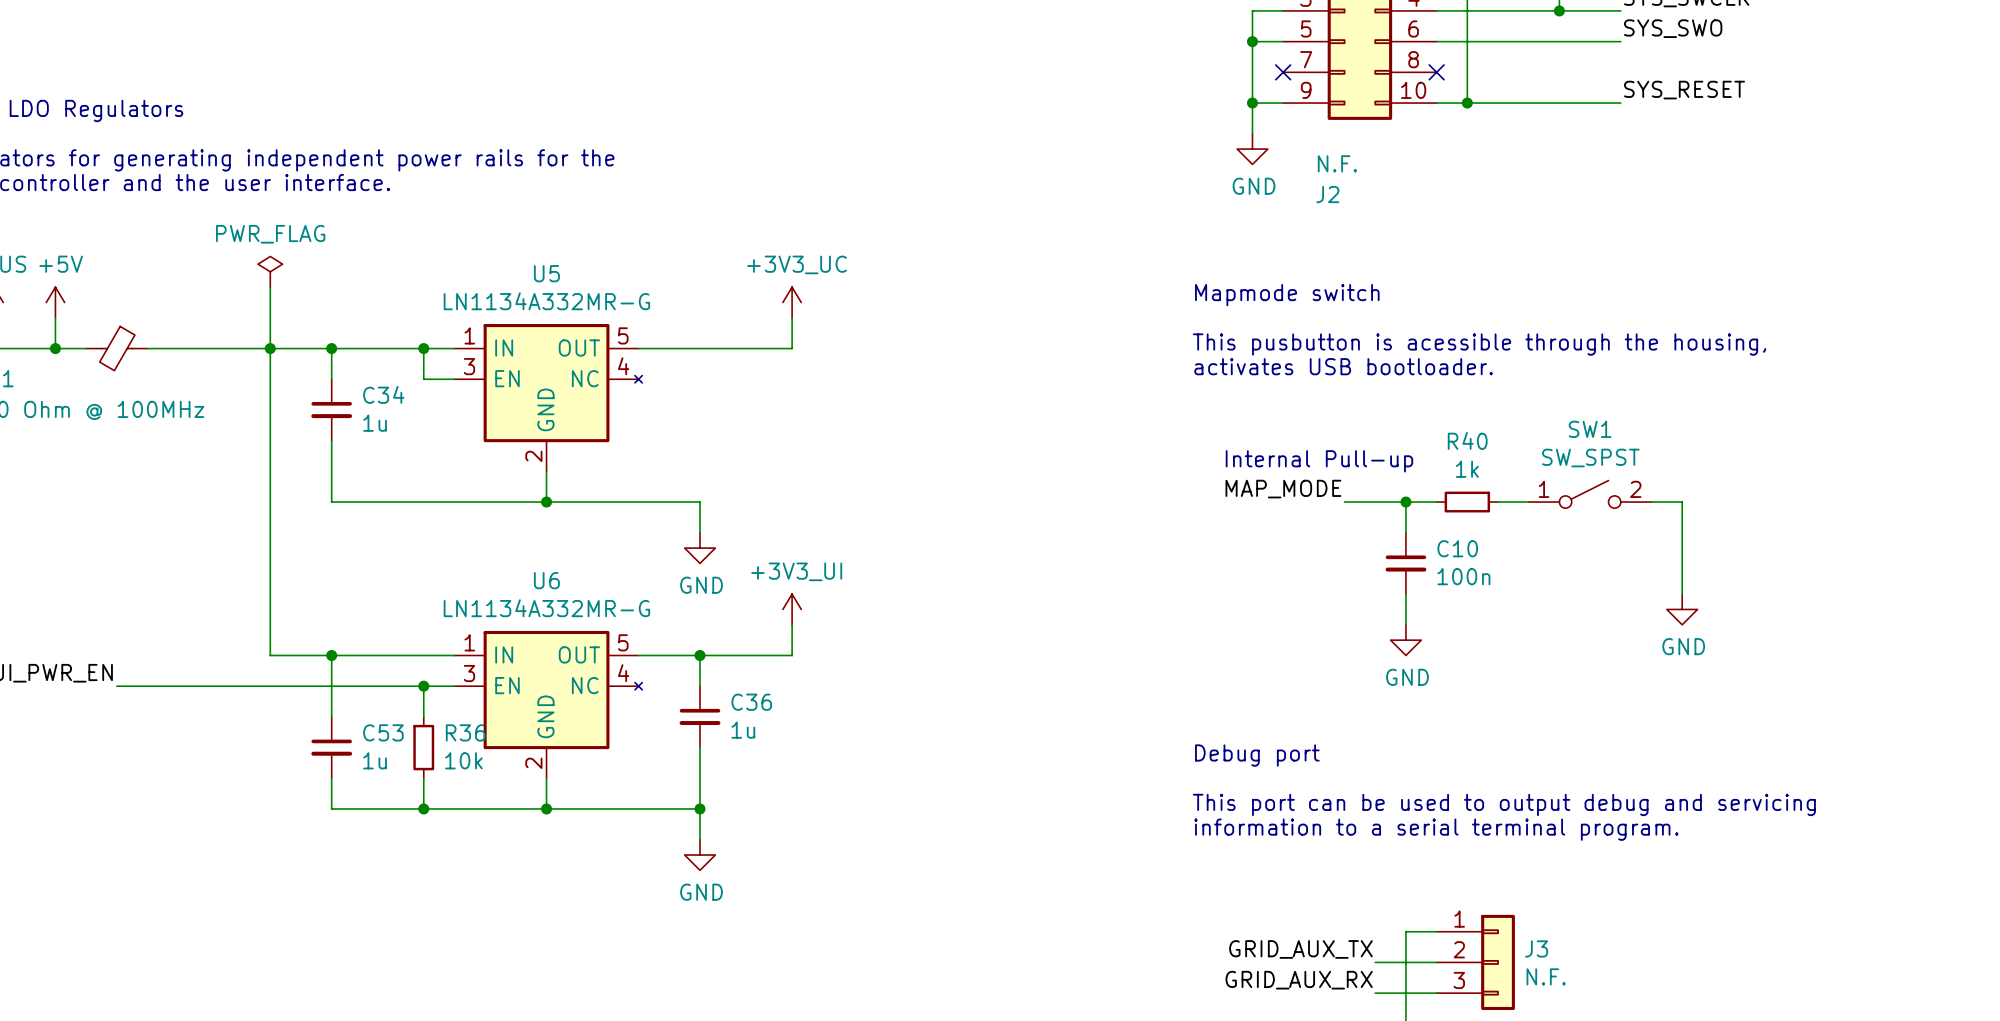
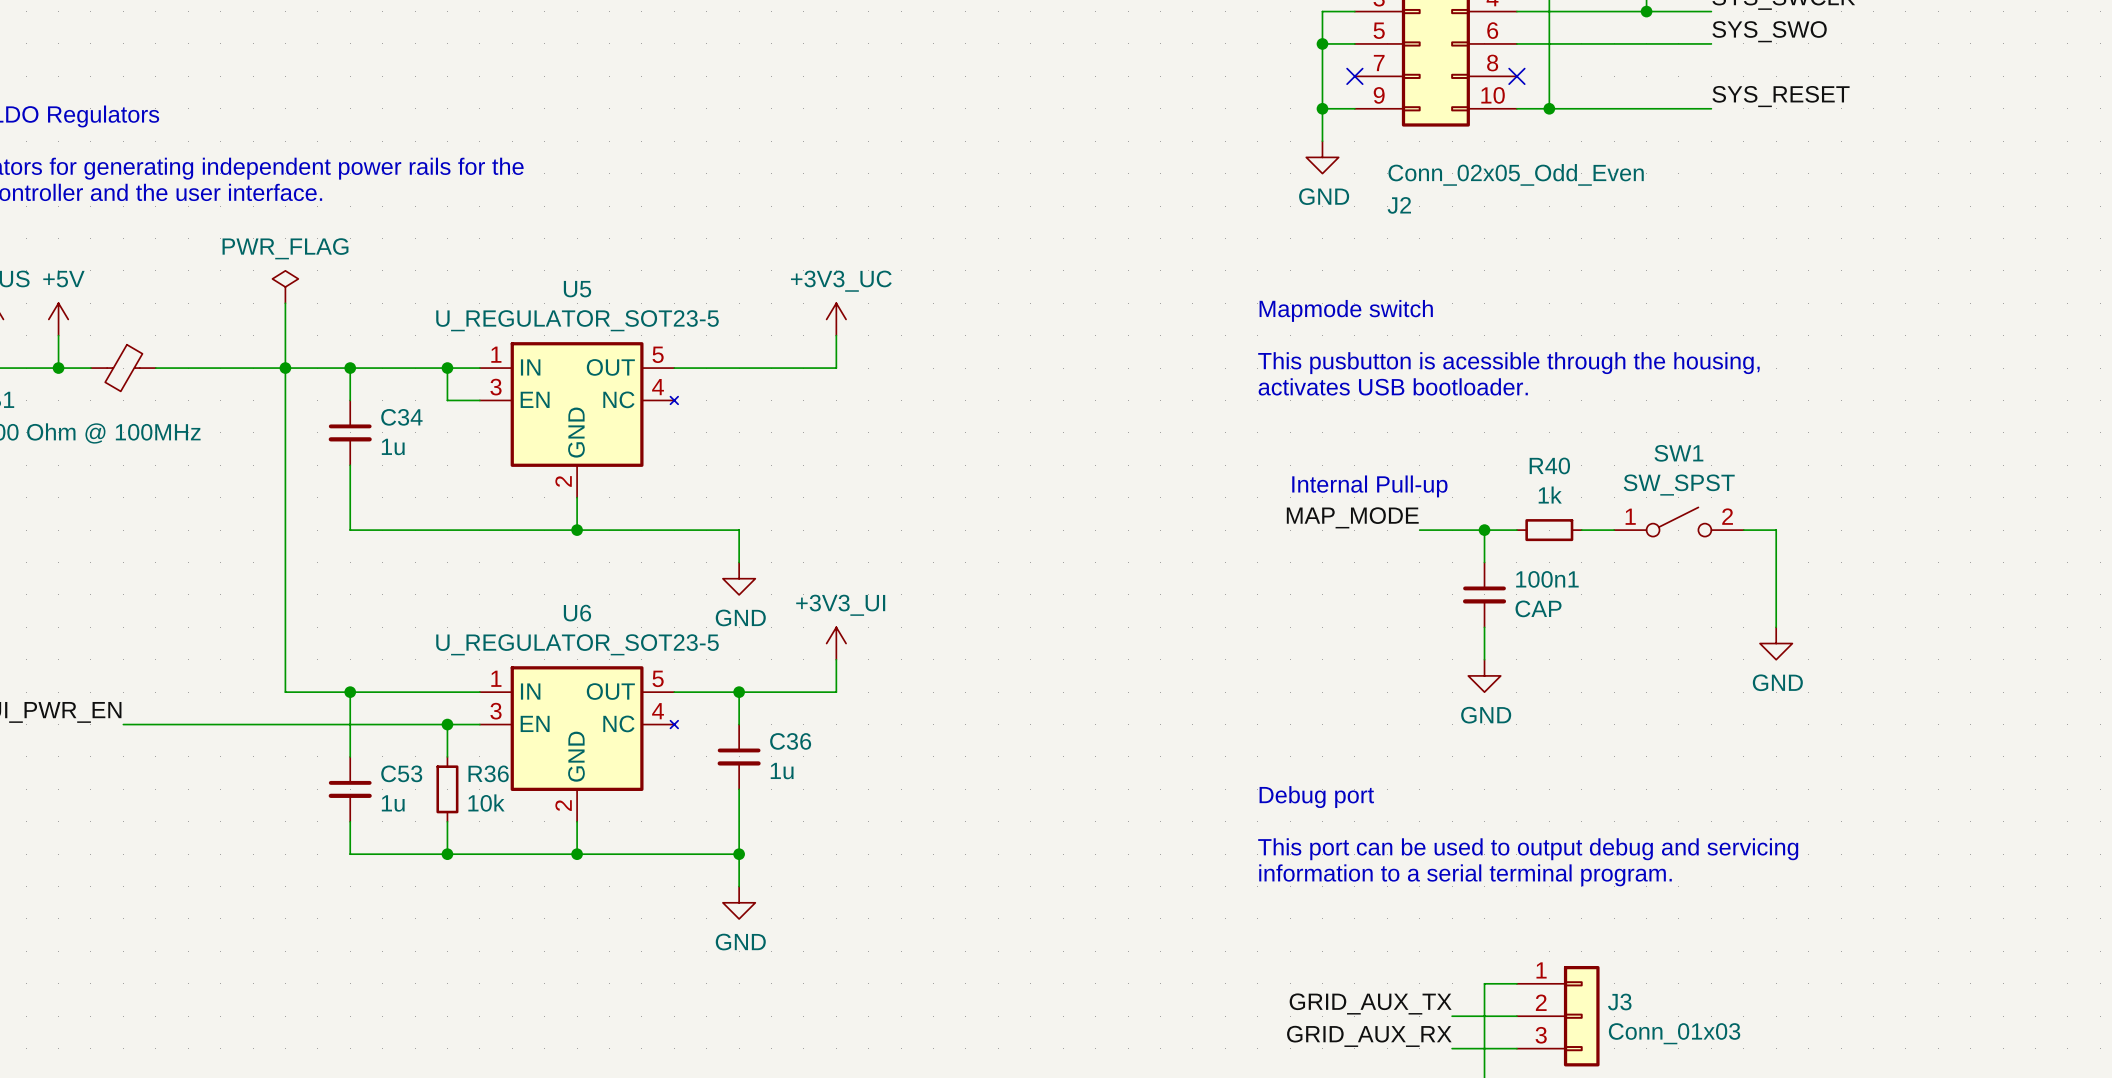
J2 value: N.F. (1337, 163) -> Conn_02x05_Odd_Even (1516, 174)
U5 value: LN1134A332MR-G (546, 301) -> U_REGULATOR_SOT23-5 (577, 320)
C10 name: C10 (1457, 548) -> 100n1 (1547, 579)
C10 value: 100n (1463, 576) -> CAP (1538, 608)
U6 value: LN1134A332MR-G (546, 608) -> U_REGULATOR_SOT23-5 (577, 644)
J3 value: N.F. (1546, 976) -> Conn_01x03 (1674, 1033)

